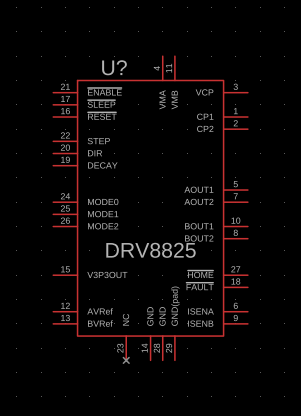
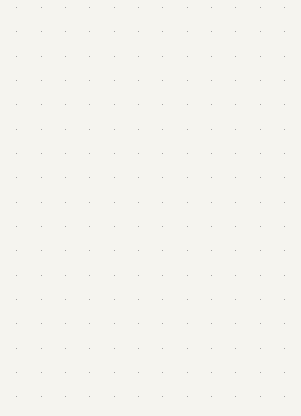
U?: DRV8825 (150, 209) -> none

